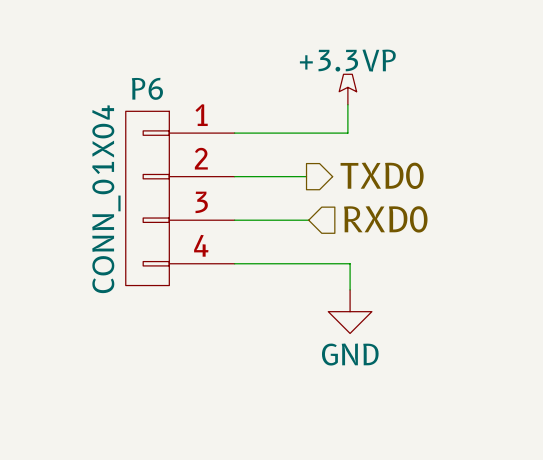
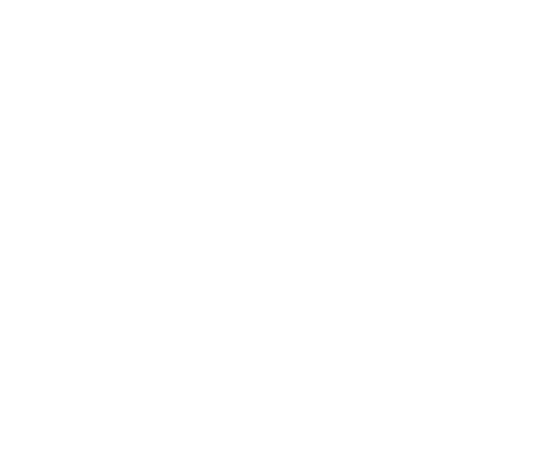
power symbol: +3.3VP (347, 89) -> none
wire: (347, 104) (347, 133) (234, 133) -> none
hierarchical label: TXD0 (382, 175) -> none
wire: (234, 176) (306, 176) -> none
P6: CONN_01X04 (180, 198) -> none
hierarchical label: RXD0 (385, 219) -> none
wire: (234, 220) (308, 220) -> none
wire: (234, 263) (350, 263) (350, 289) -> none
power symbol: GND (350, 311) -> none

